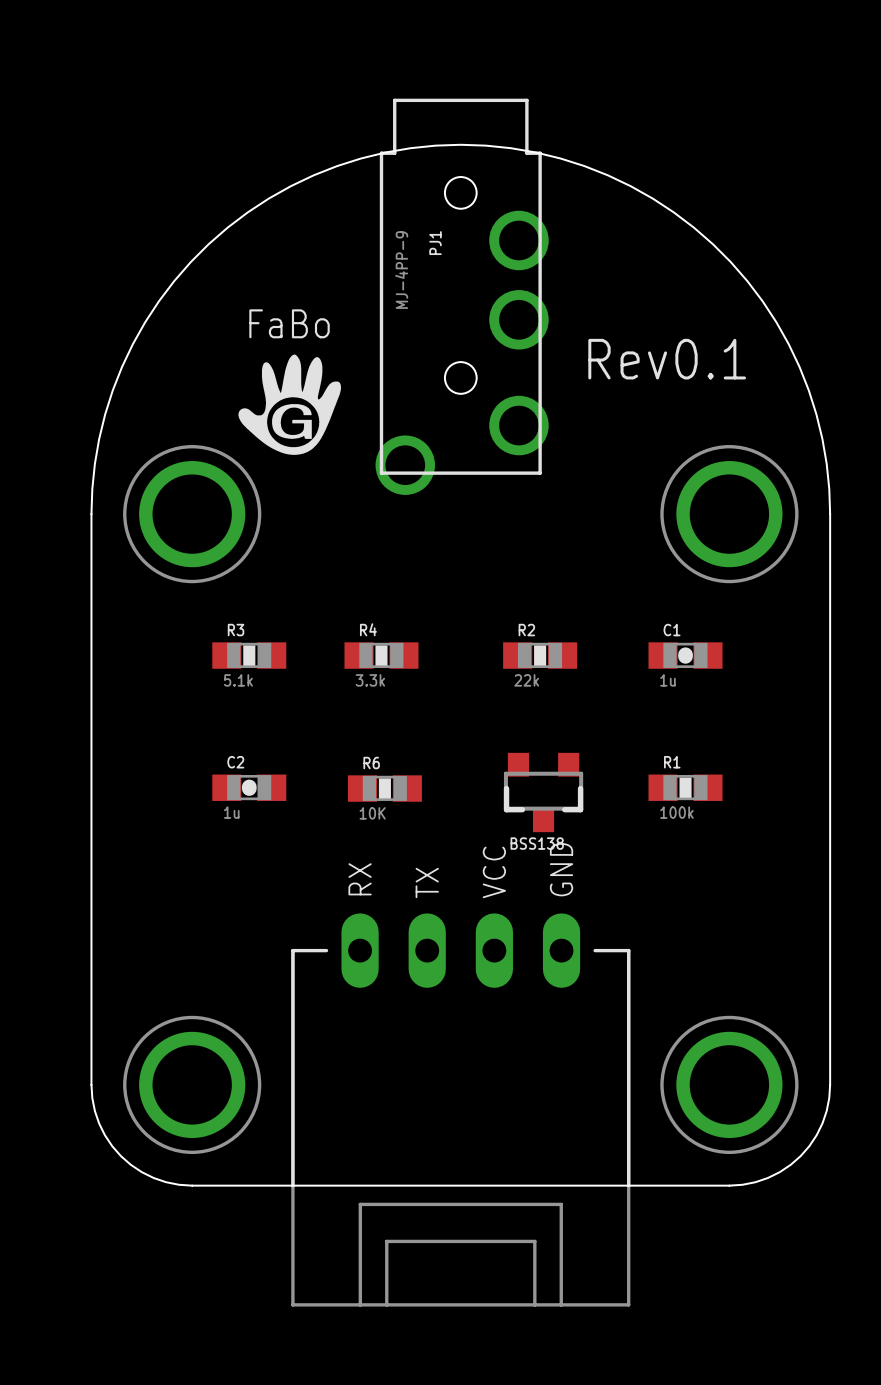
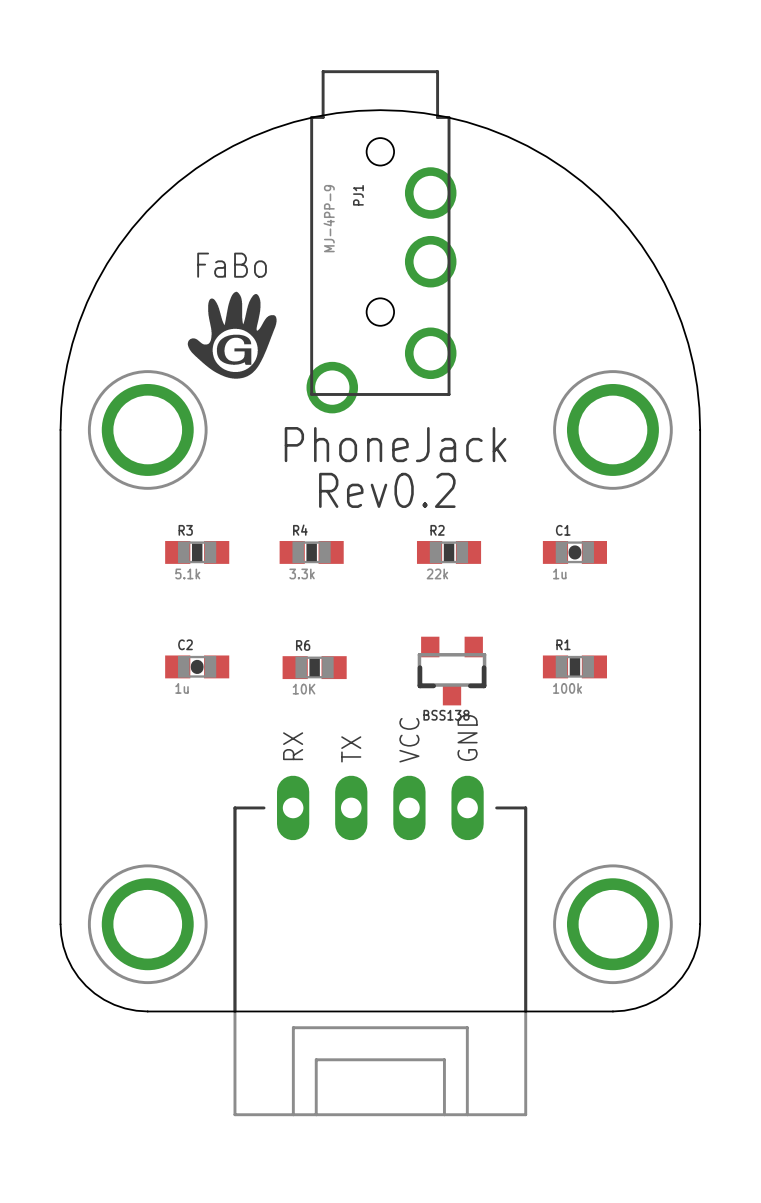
text: Rev0.1 (667, 359) -> none
text: none -> PhoneJack (395, 444)
text: none -> Rev0.2 (387, 490)

